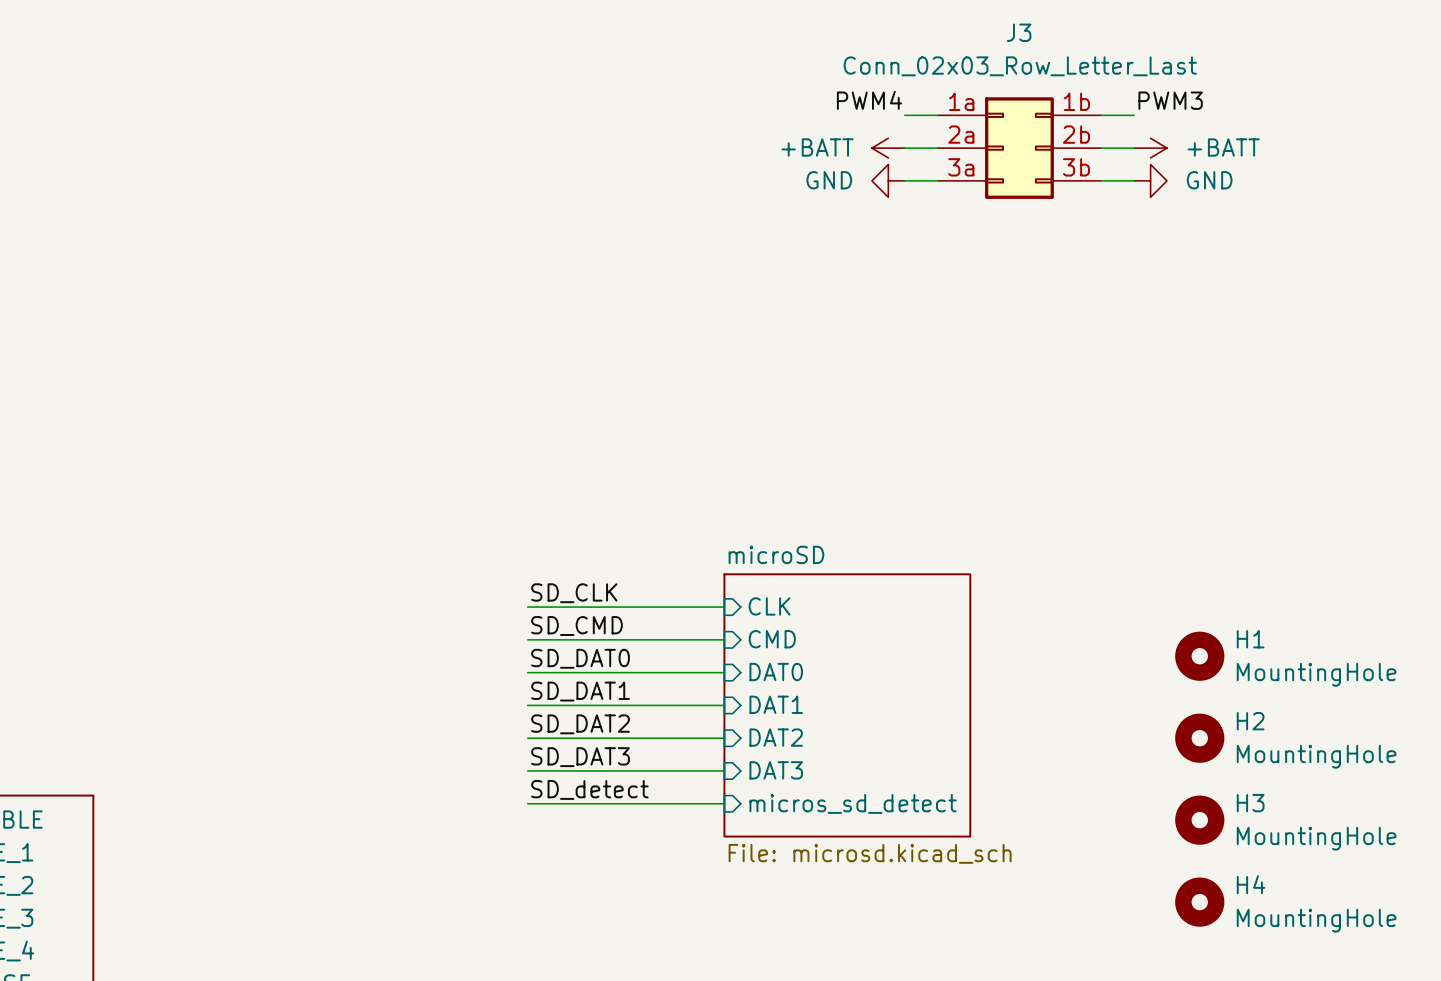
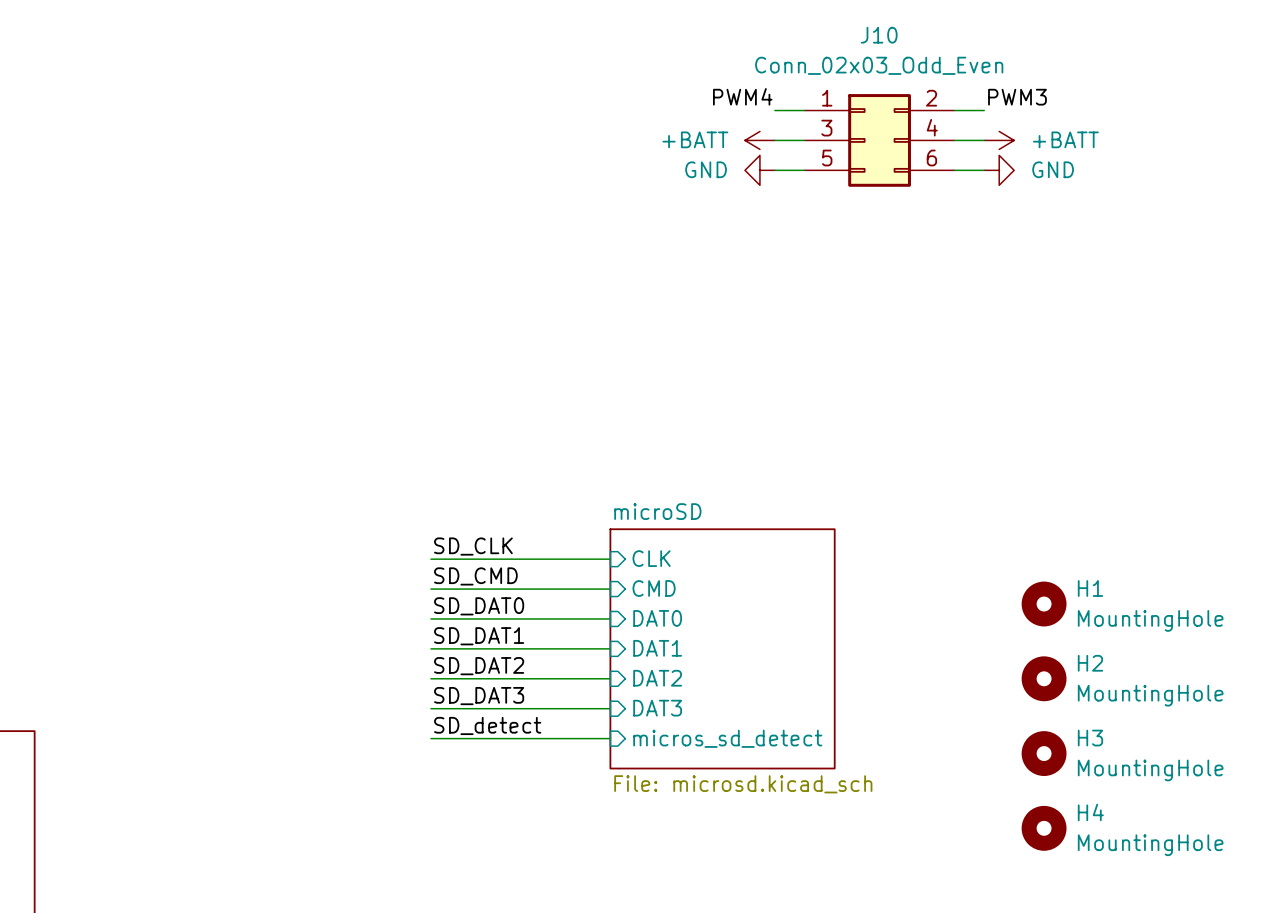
J3 name: J3 (1019, 32) -> J10 (879, 35)
J3 value: Conn_02x03_Row_Letter_Last (1020, 66) -> Conn_02x03_Odd_Even (879, 65)
J3 pin number: 1a (961, 101) -> 1 (827, 98)
J3 pin number: 1b (1076, 101) -> 2 (931, 98)
J3 pin number: 2a (961, 134) -> 3 (826, 128)
J3 pin number: 2b (1076, 134) -> 4 (932, 127)
J3 pin number: 3a (961, 167) -> 5 (827, 158)
J3 pin number: 3b (1076, 167) -> 6 (931, 158)

